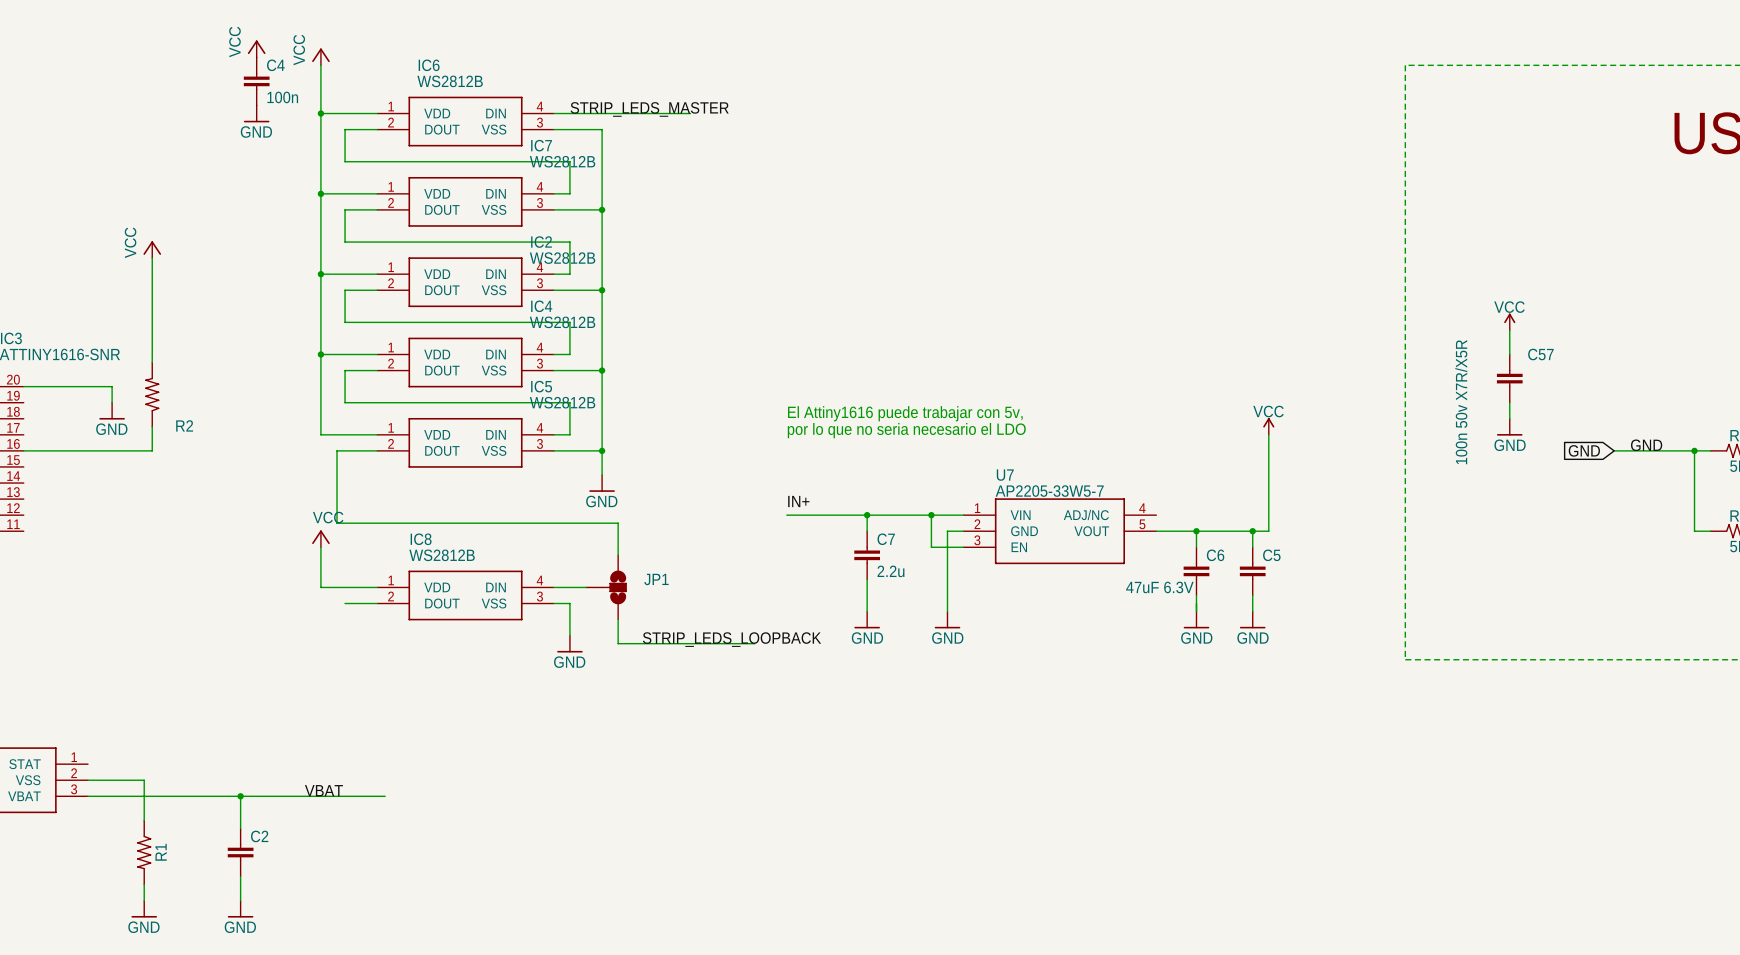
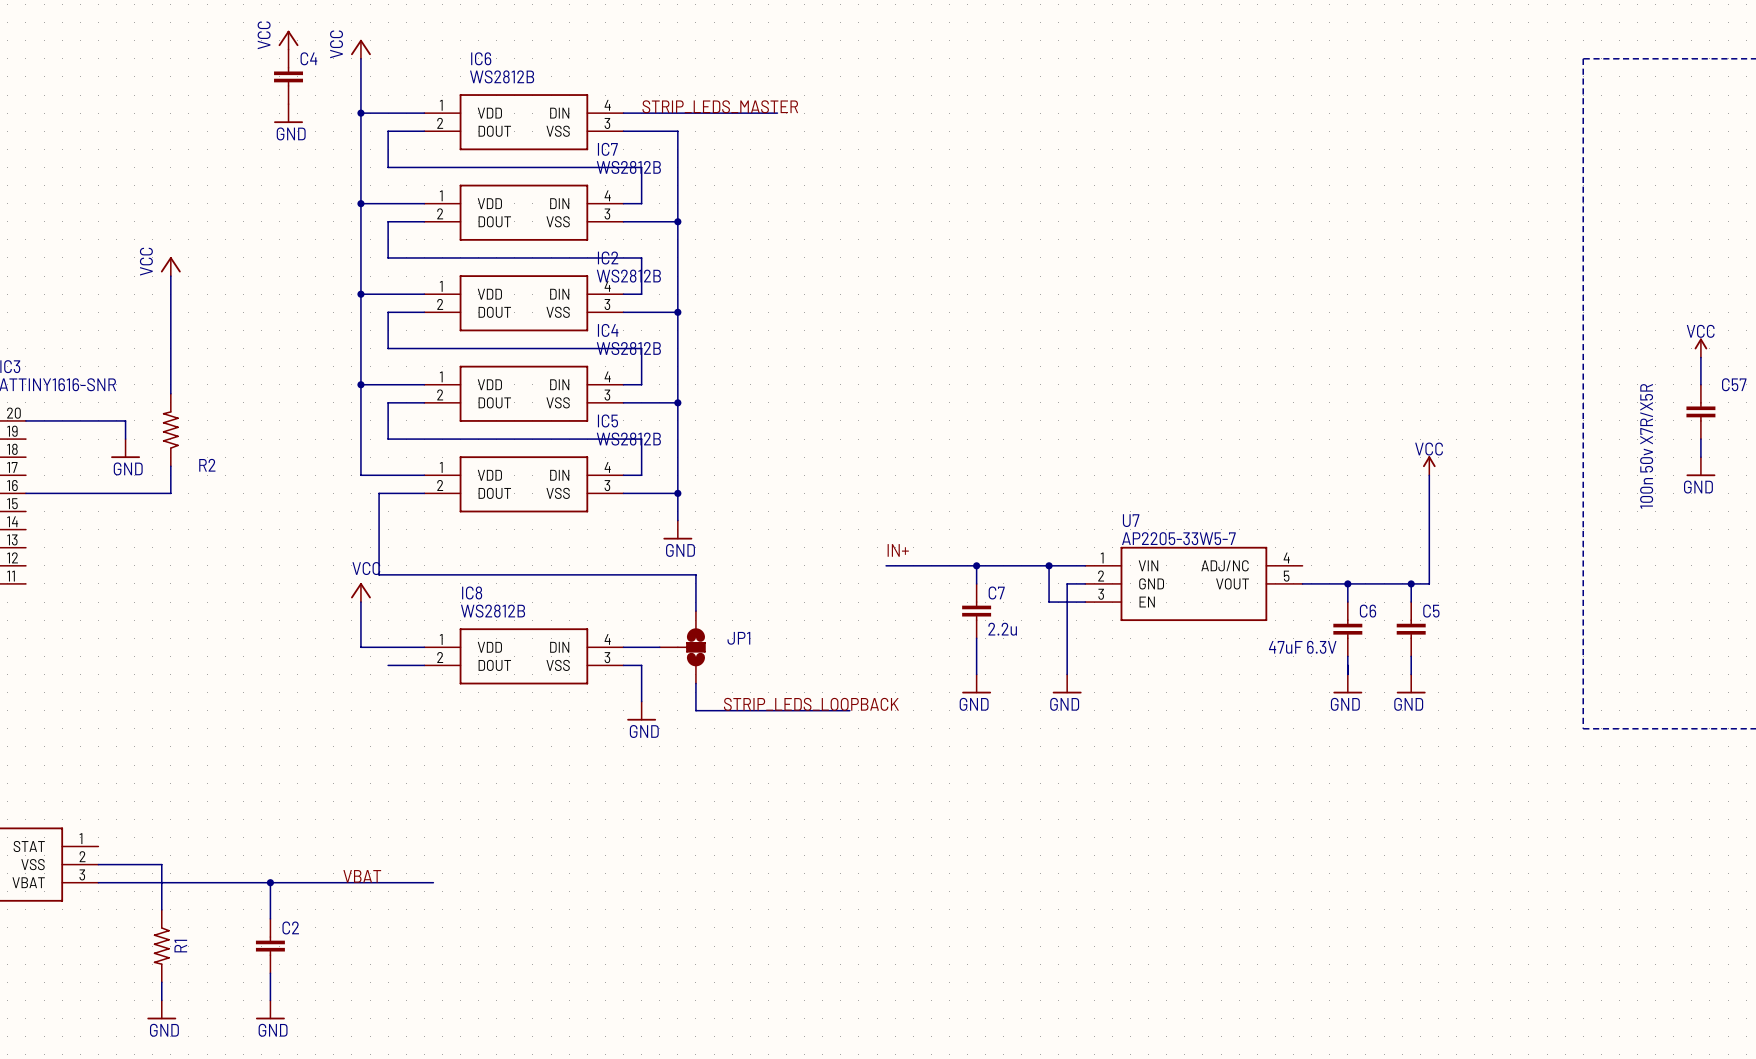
C4 value: 100n (282, 97) -> none
text: El Attiny1616 puede trabajar con 5v, (905, 413) -> none
text: por lo que no seria necesario el LDO (906, 430) -> none

